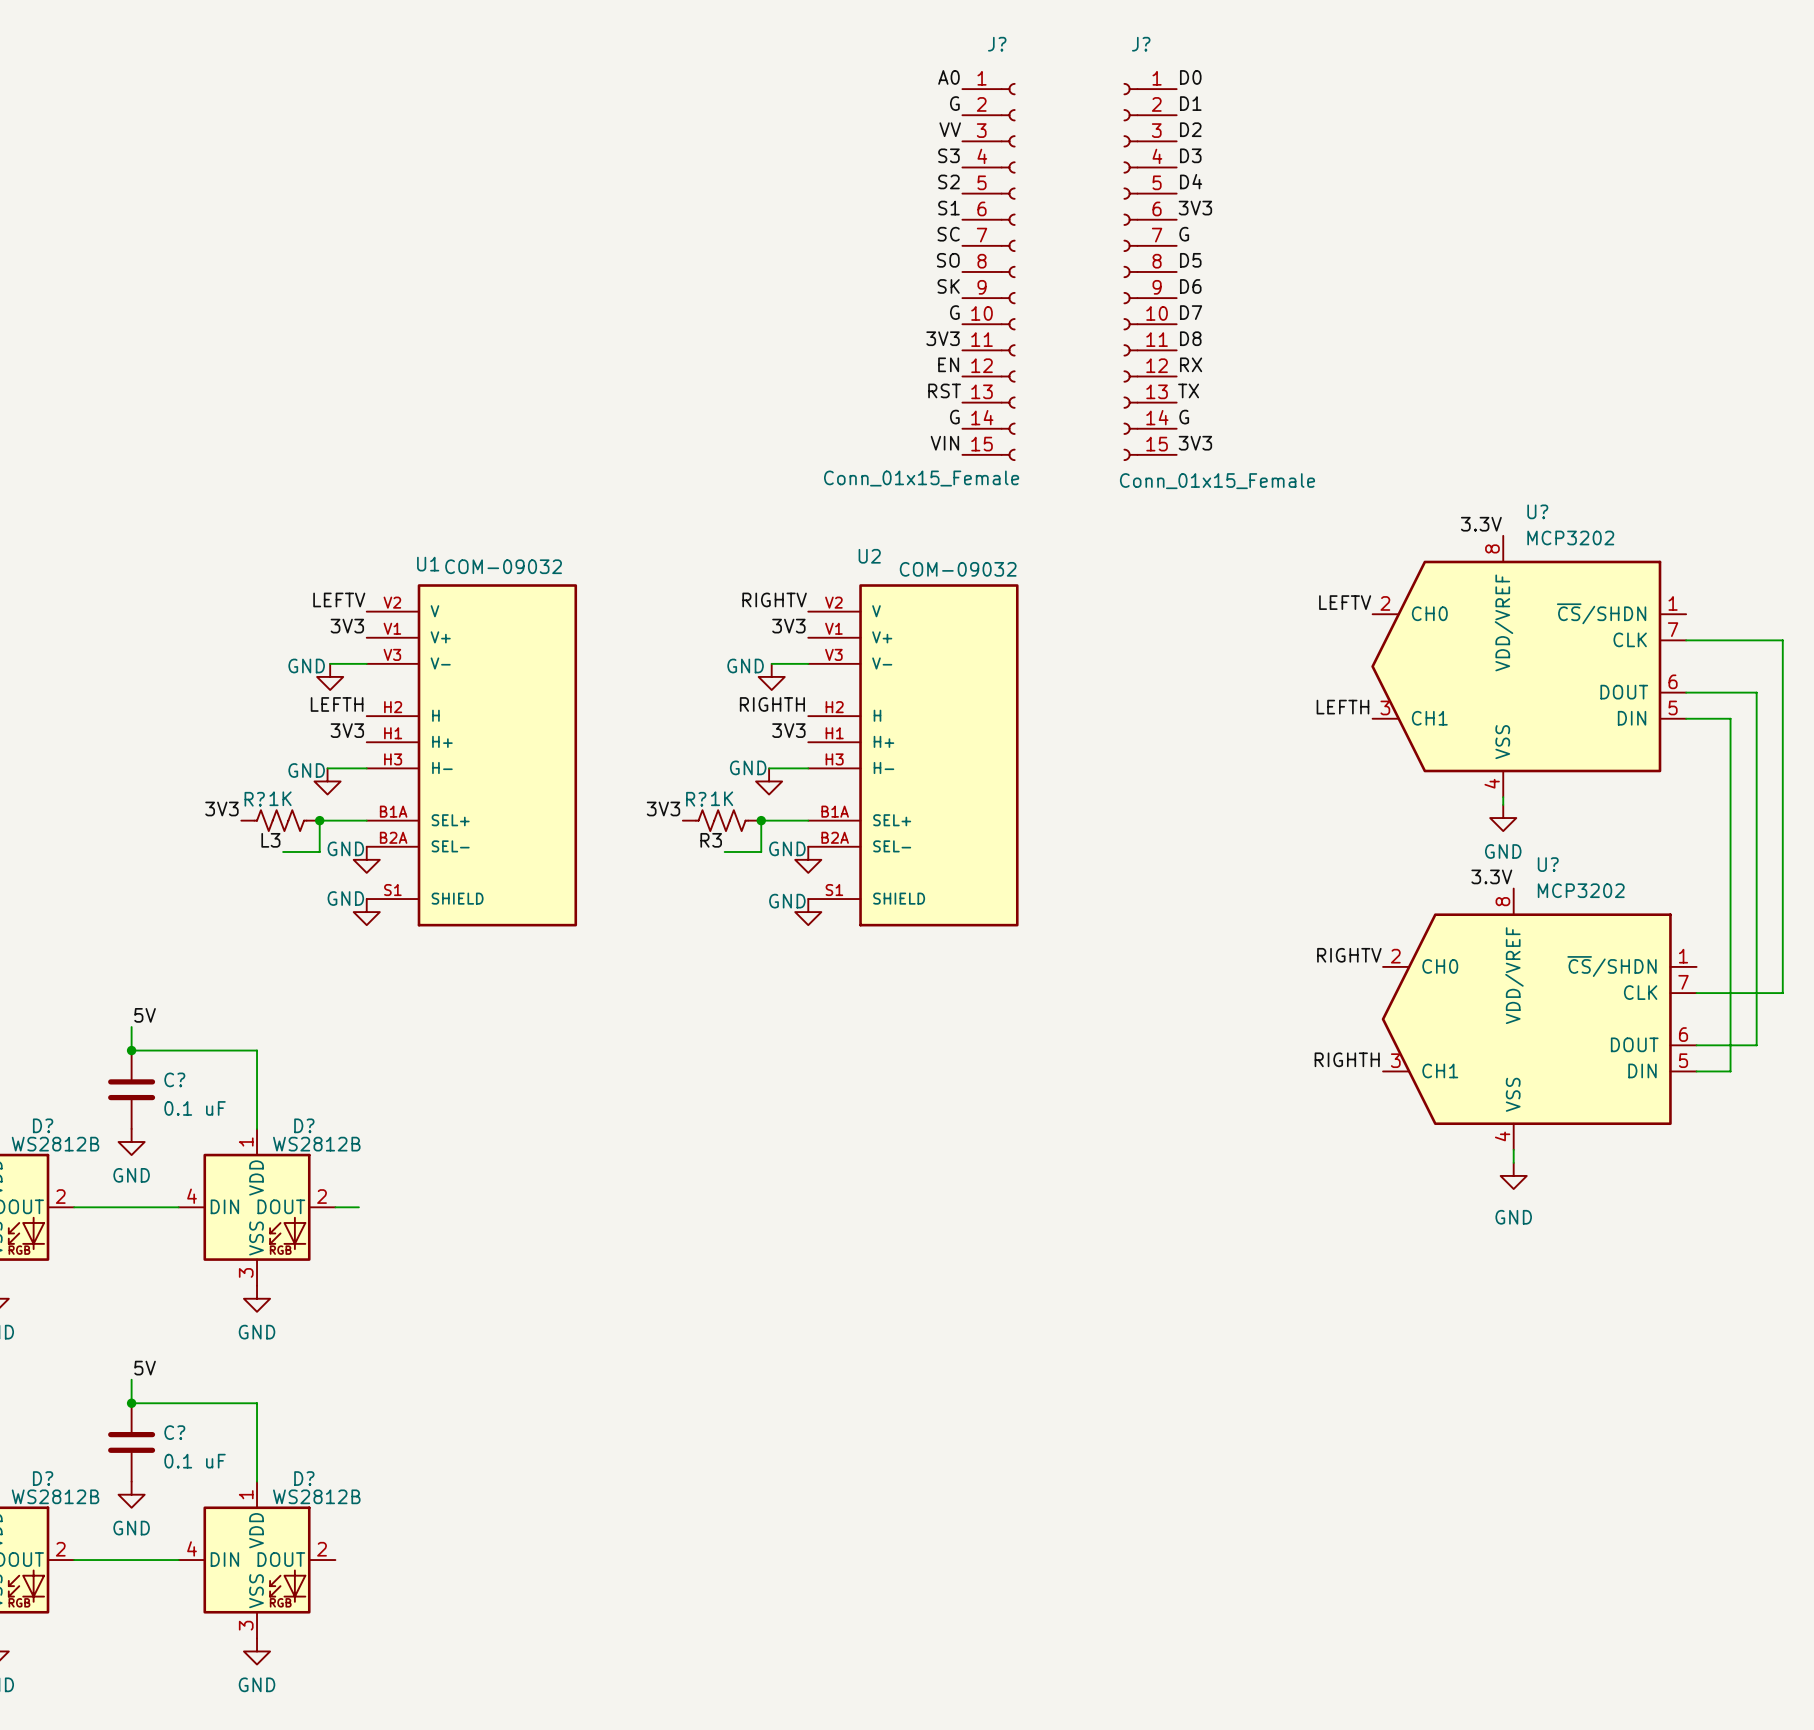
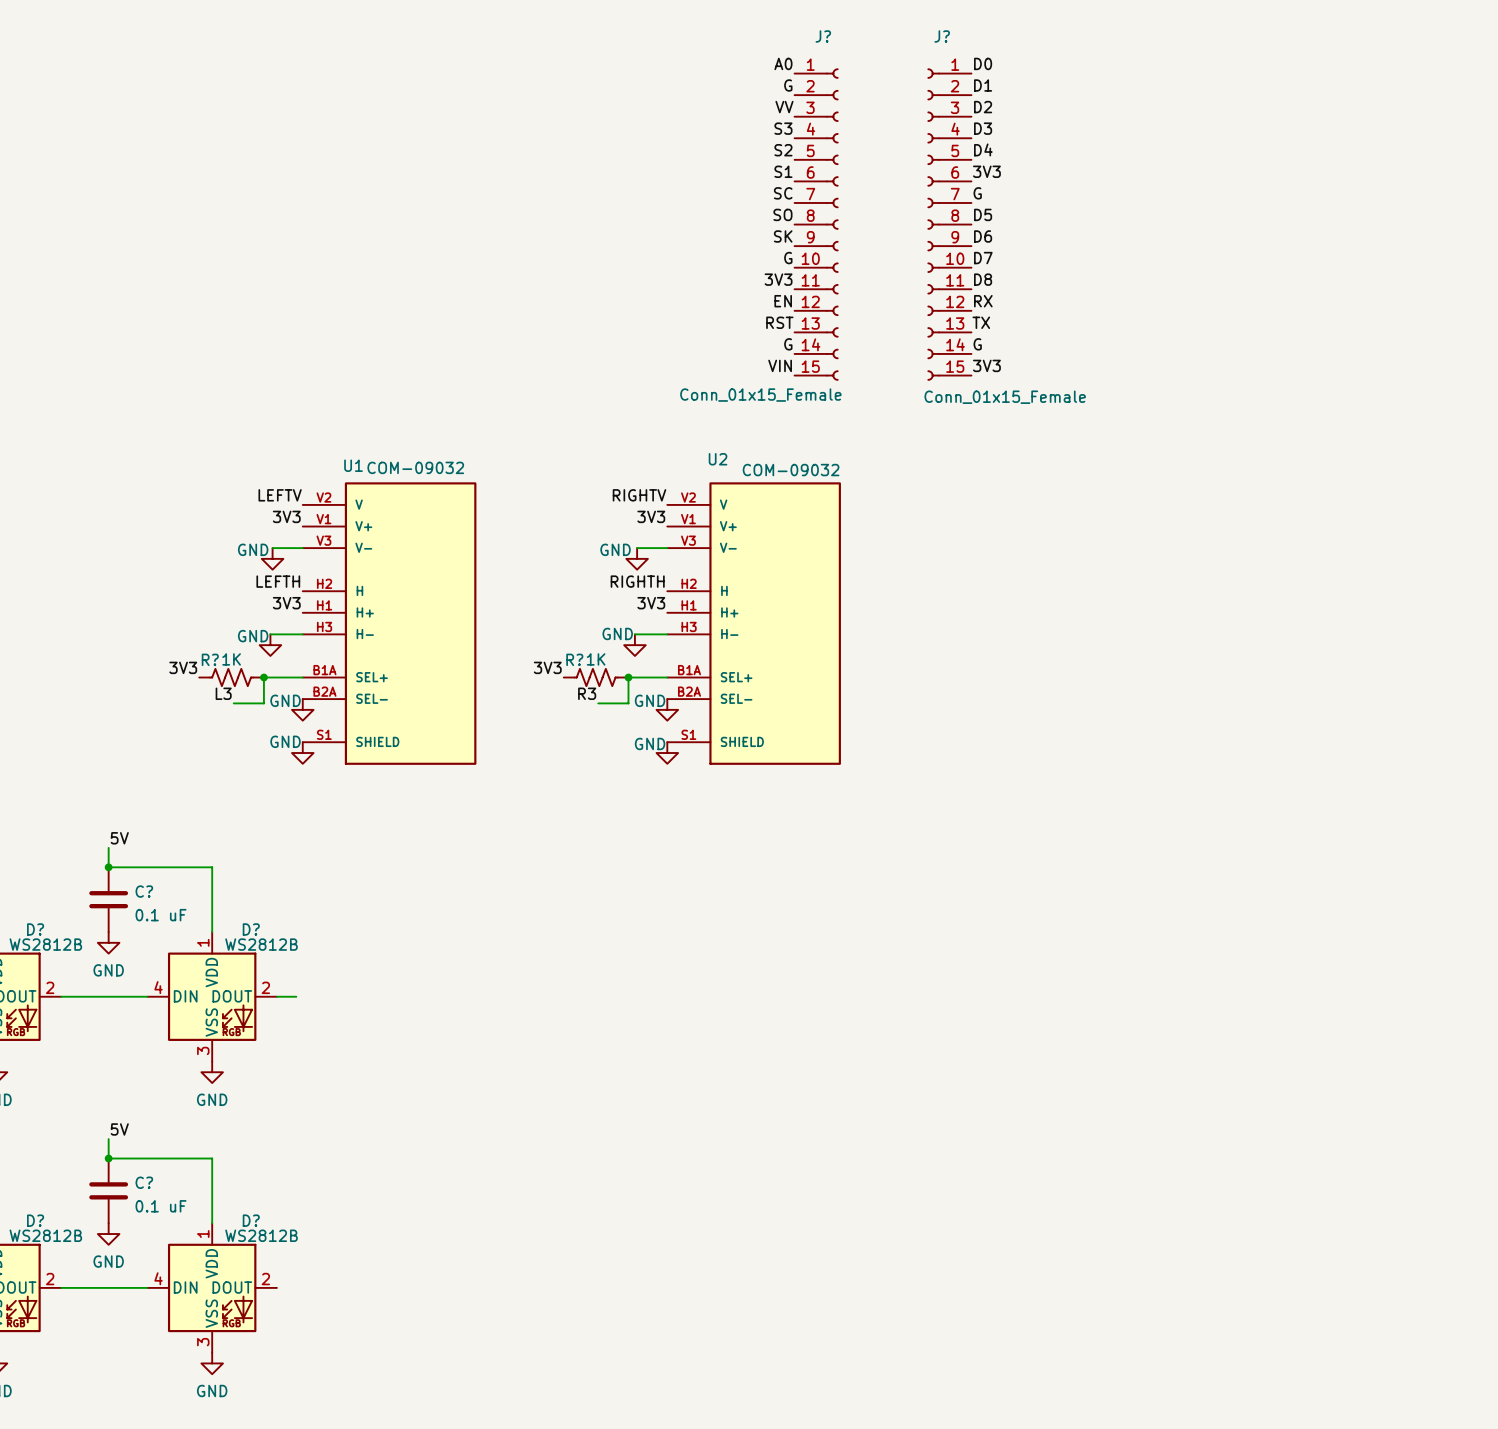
label: 3.3V (1481, 524) -> none
label: LEFTV (1345, 602) -> none
wire: (1686, 640) (1782, 640) (1782, 993) (1696, 993) -> none
U?: MCP3202 (1528, 666) -> none
wire: (1686, 692) (1756, 692) (1756, 1045) (1696, 1045) -> none
label: LEFTH (1342, 707) -> none
wire: (1686, 718) (1730, 718) (1730, 1071) (1696, 1071) -> none
wire: (1503, 797) (1503, 804) -> none
power symbol: GND (1503, 818) -> none
label: 3.3V (1491, 876) -> none
label: RIGHTV (1349, 955) -> none
U?: MCP3202 (1539, 1019) -> none
label: RIGHTH (1347, 1059) -> none
wire: (1513, 1149) (1513, 1162) -> none
power symbol: GND (1513, 1175) -> none

